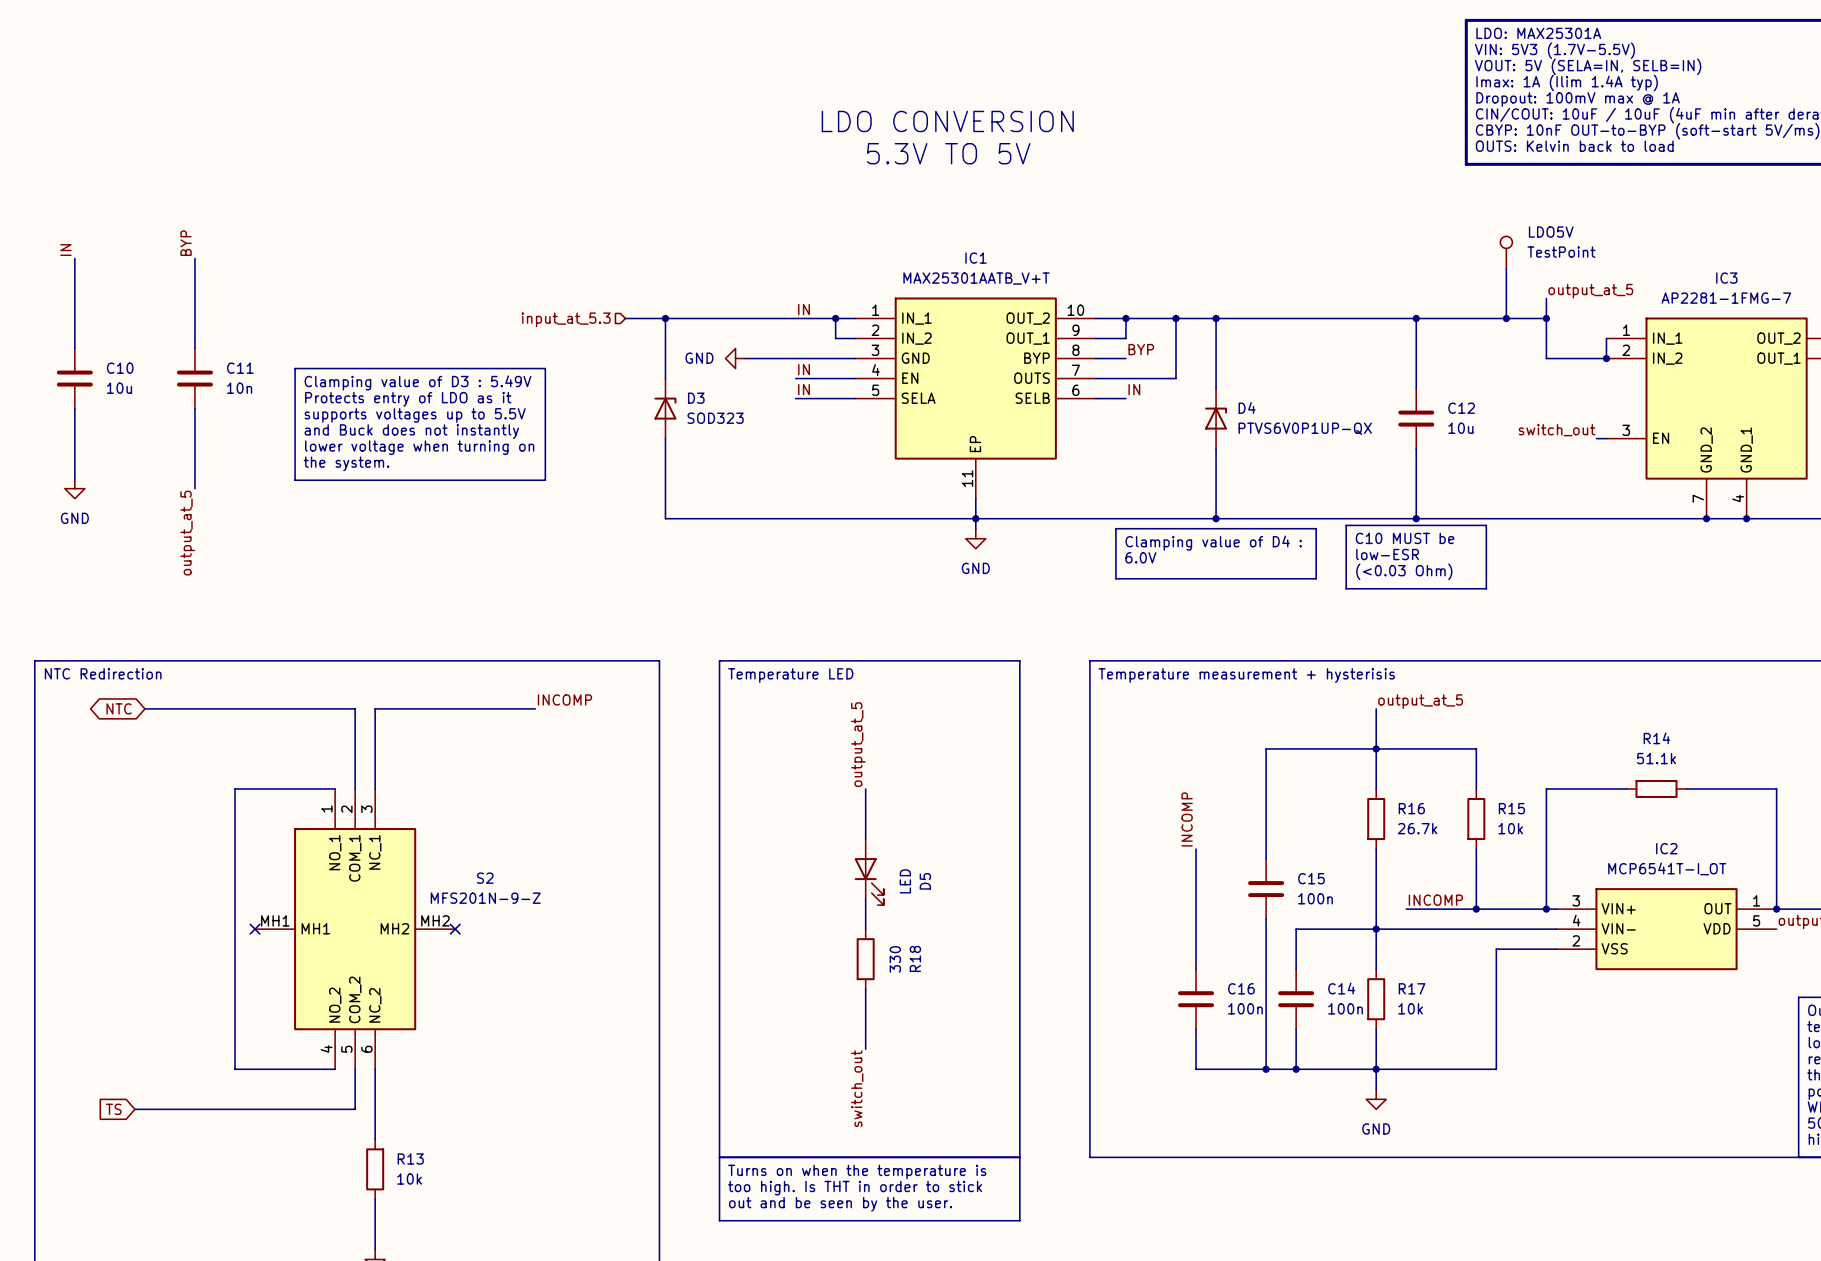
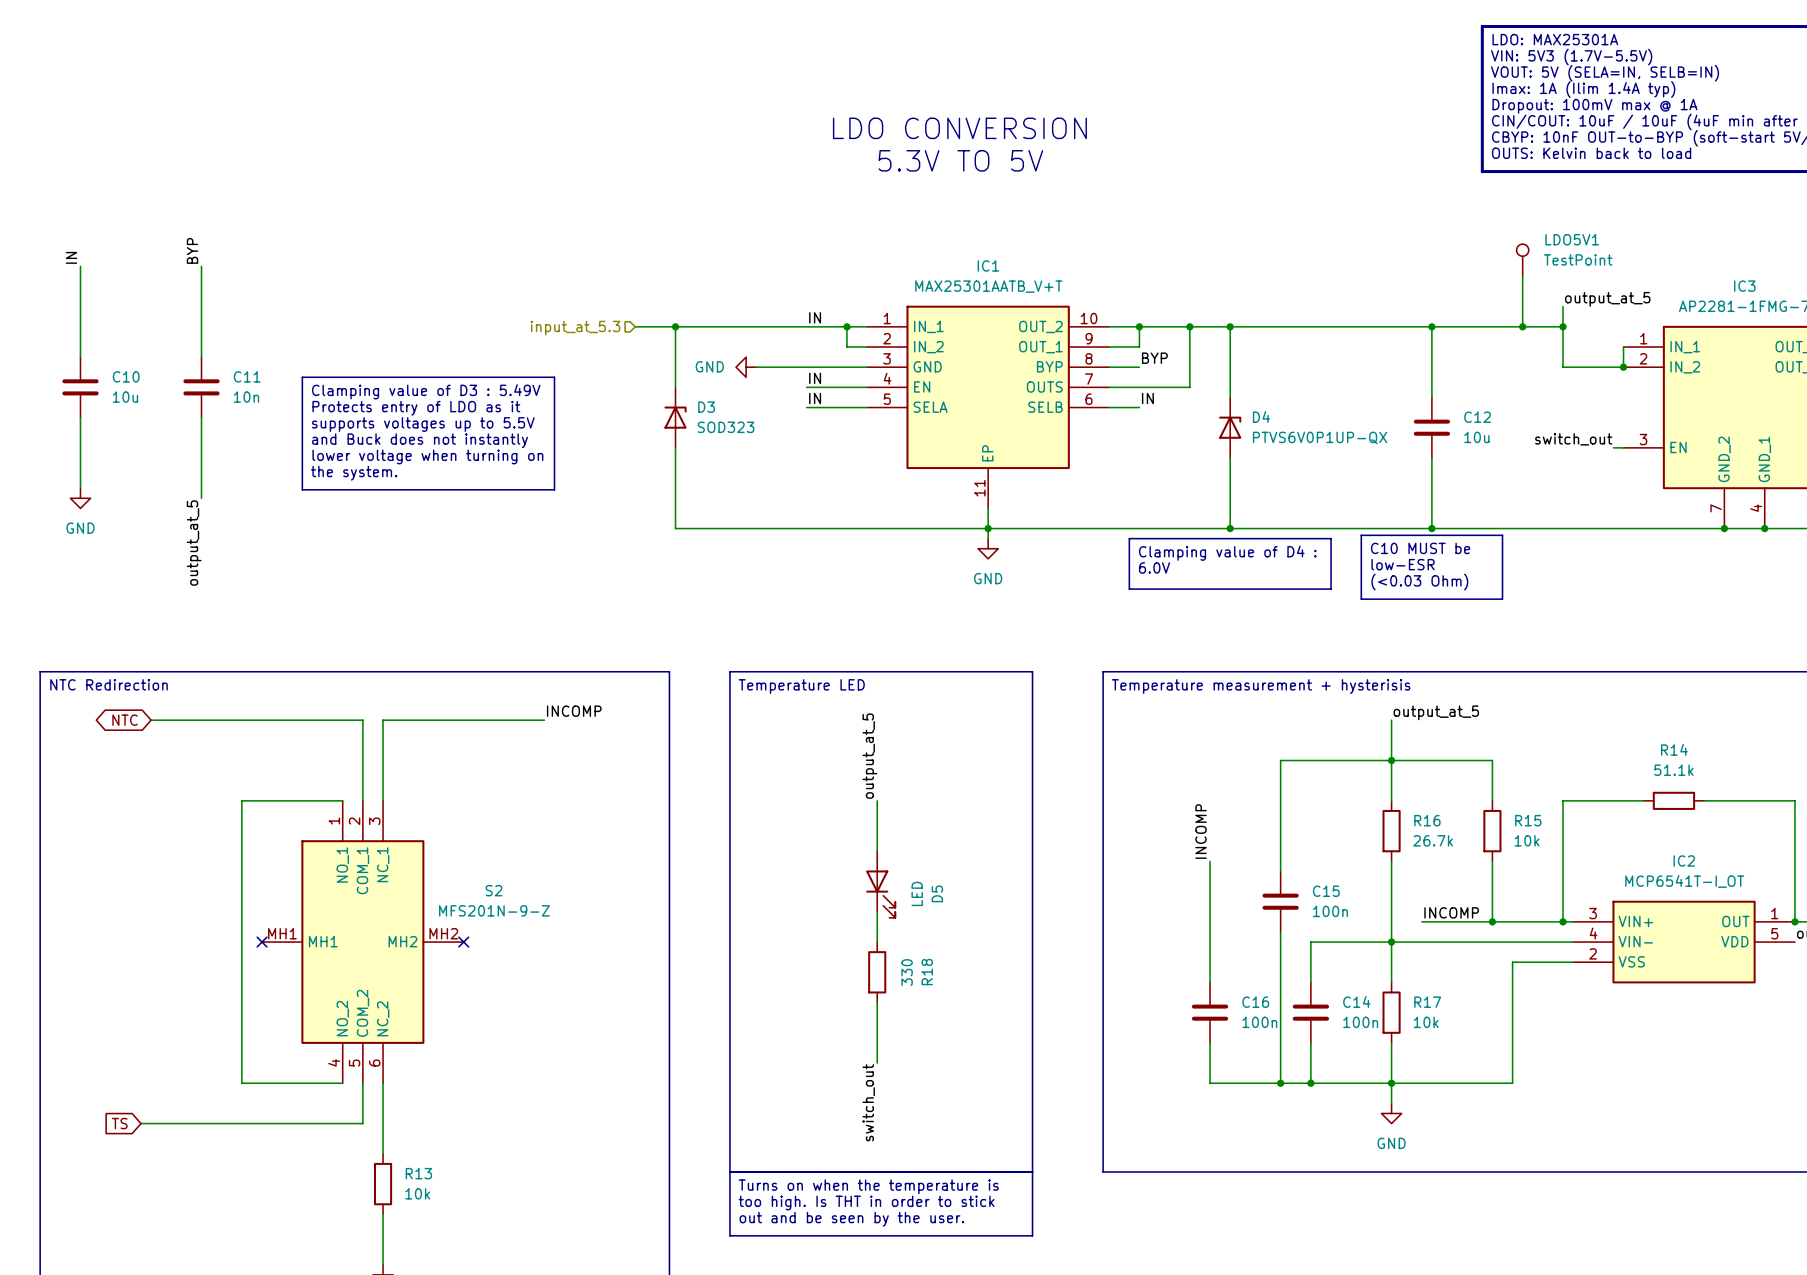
LDO5V name: LDO5V (1551, 232) -> LDO5V1 (1572, 239)

